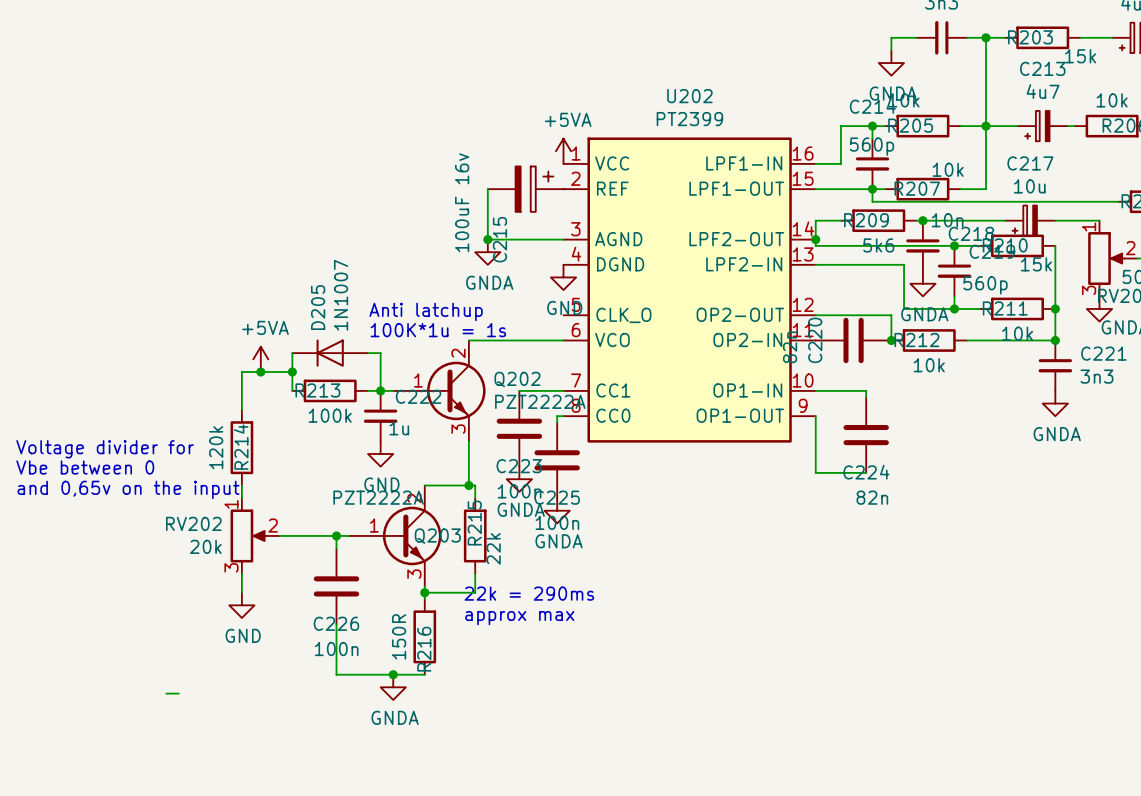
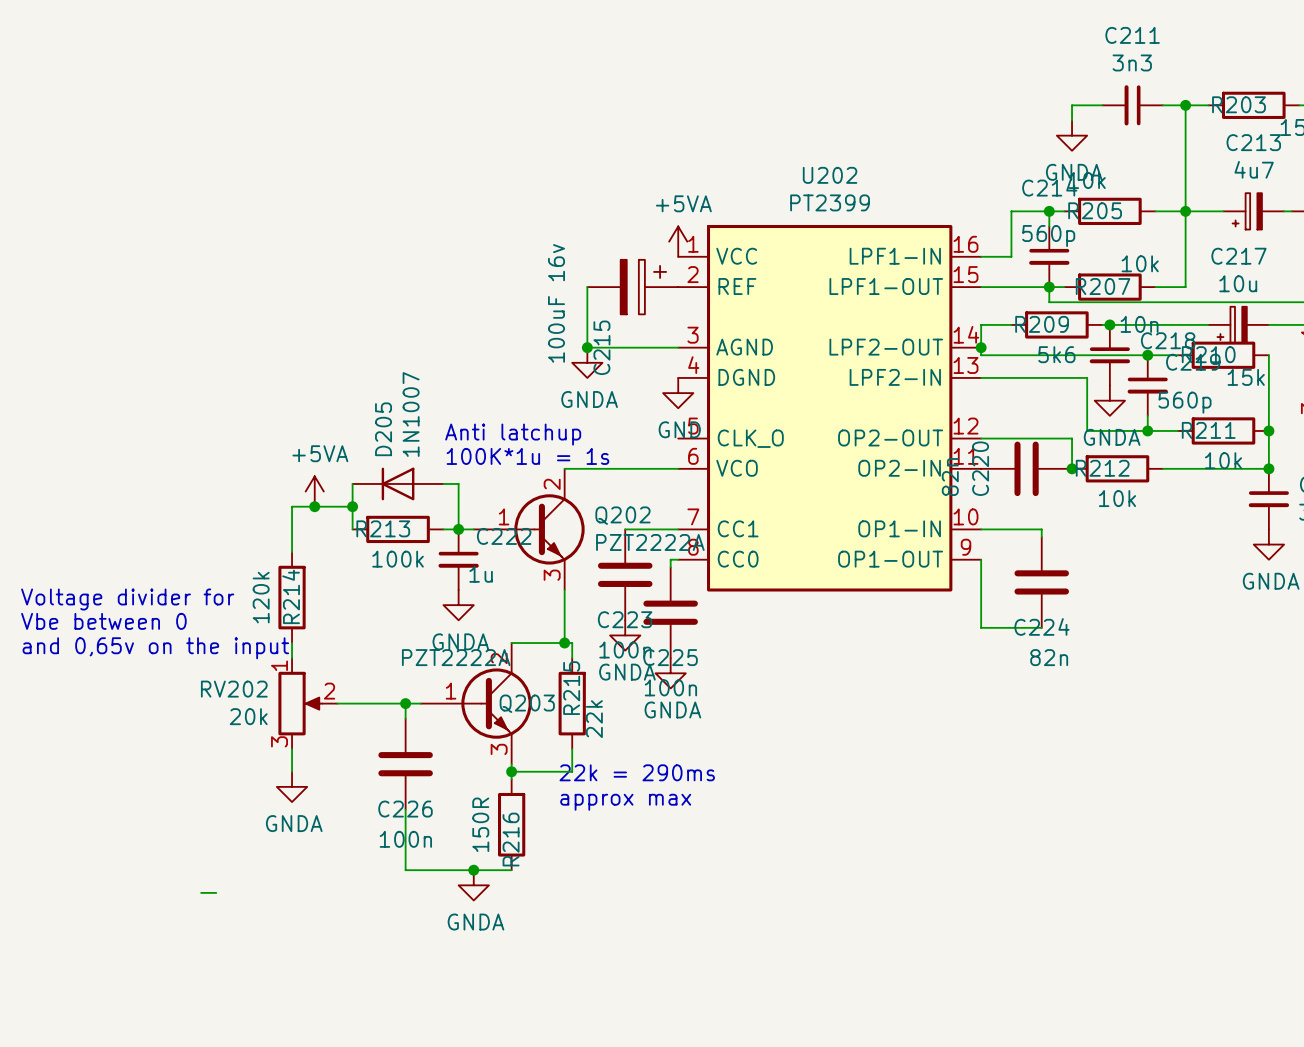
power symbol: GND (380, 454) -> GNDA (458, 605)
power symbol: GND (241, 605) -> GNDA (292, 786)

